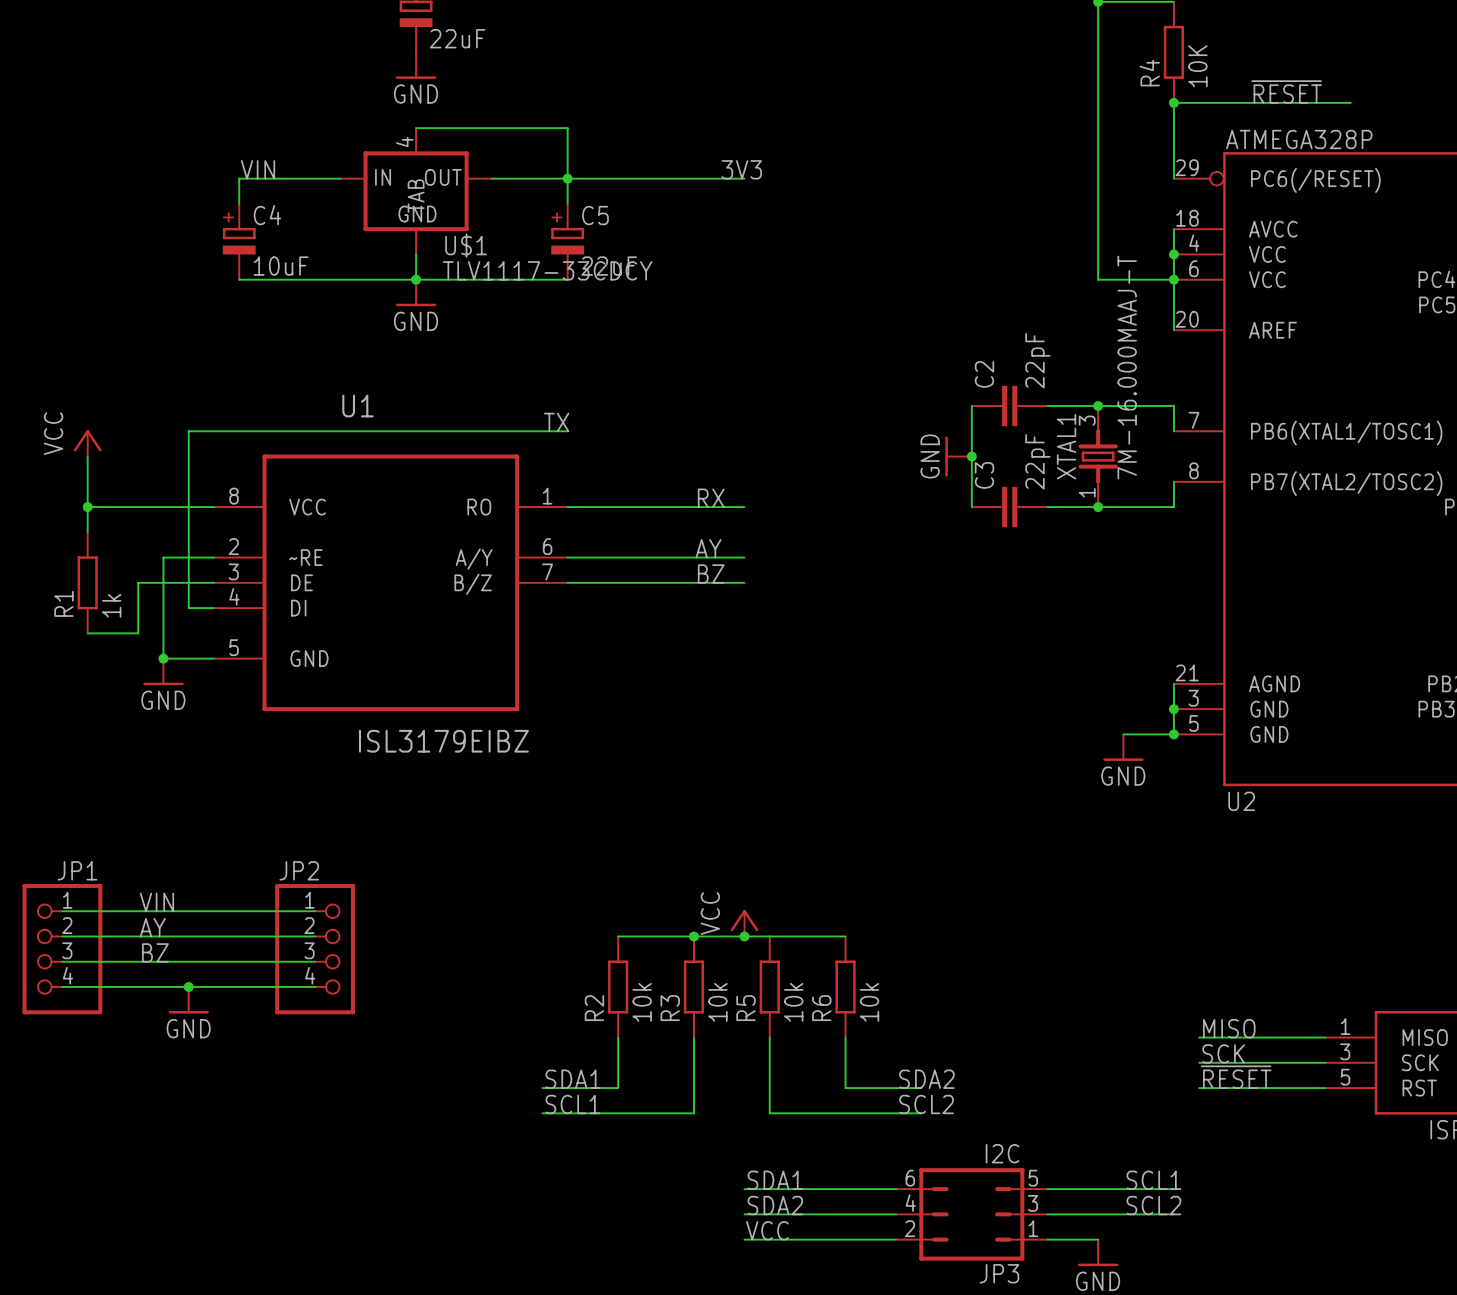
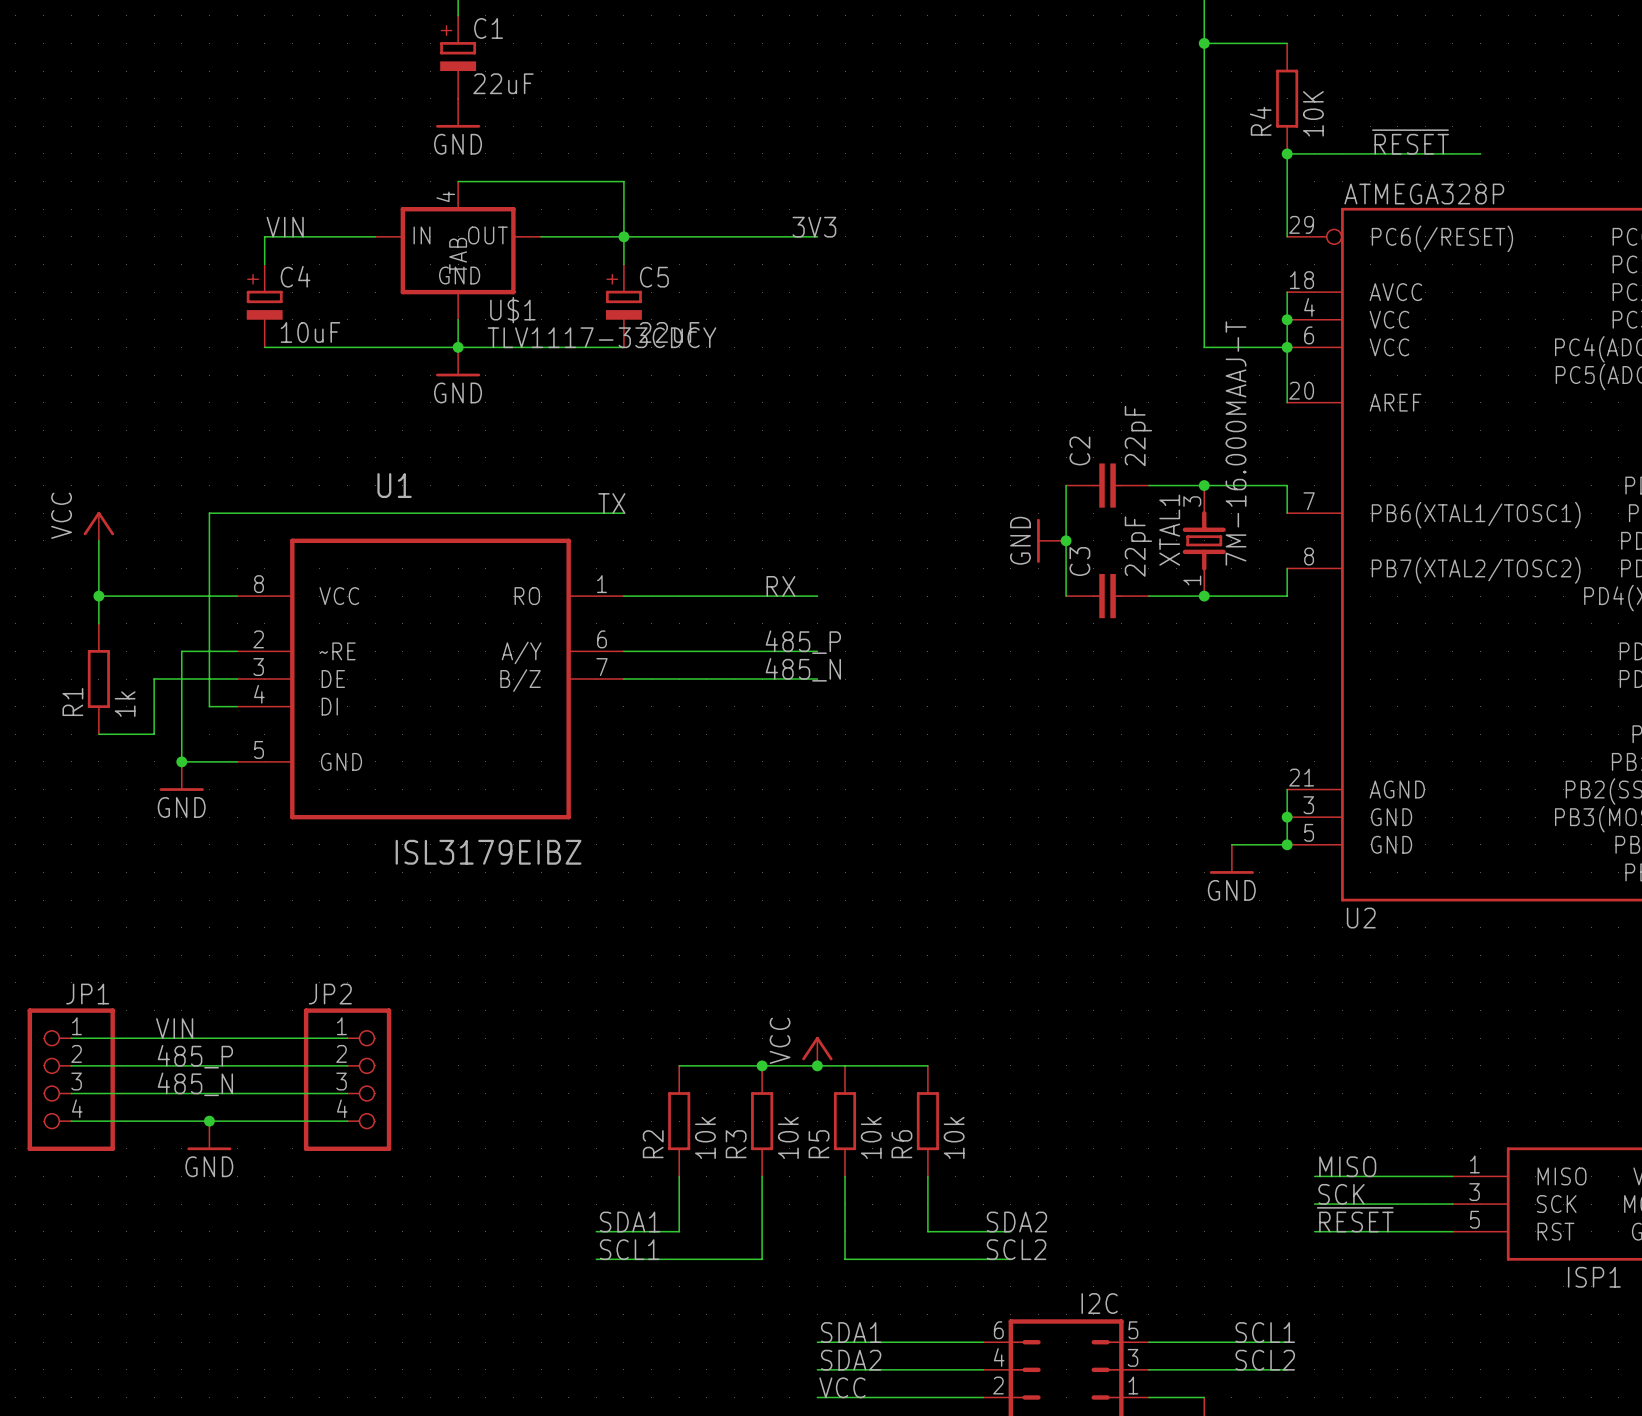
label: AY (708, 548) -> 485_P (803, 642)
label: BZ (711, 574) -> 485_N (803, 669)
label: AY (152, 927) -> 485_P (195, 1056)
label: BZ (155, 952) -> 485_N (195, 1084)

